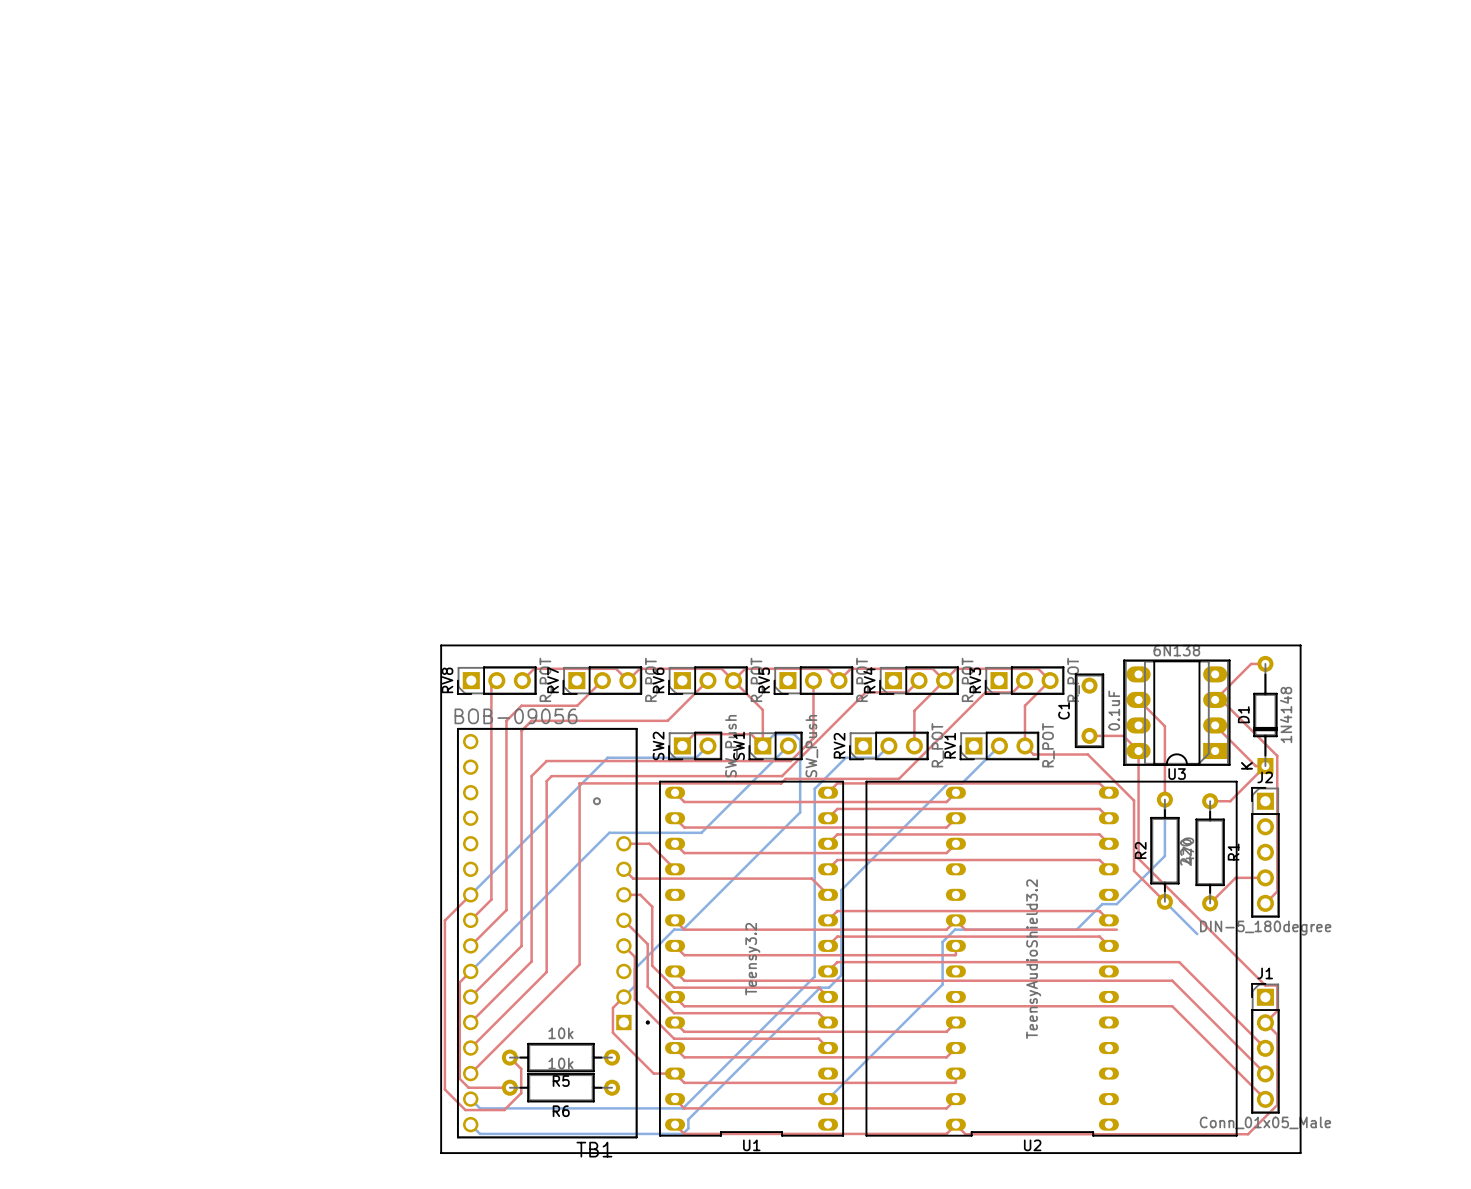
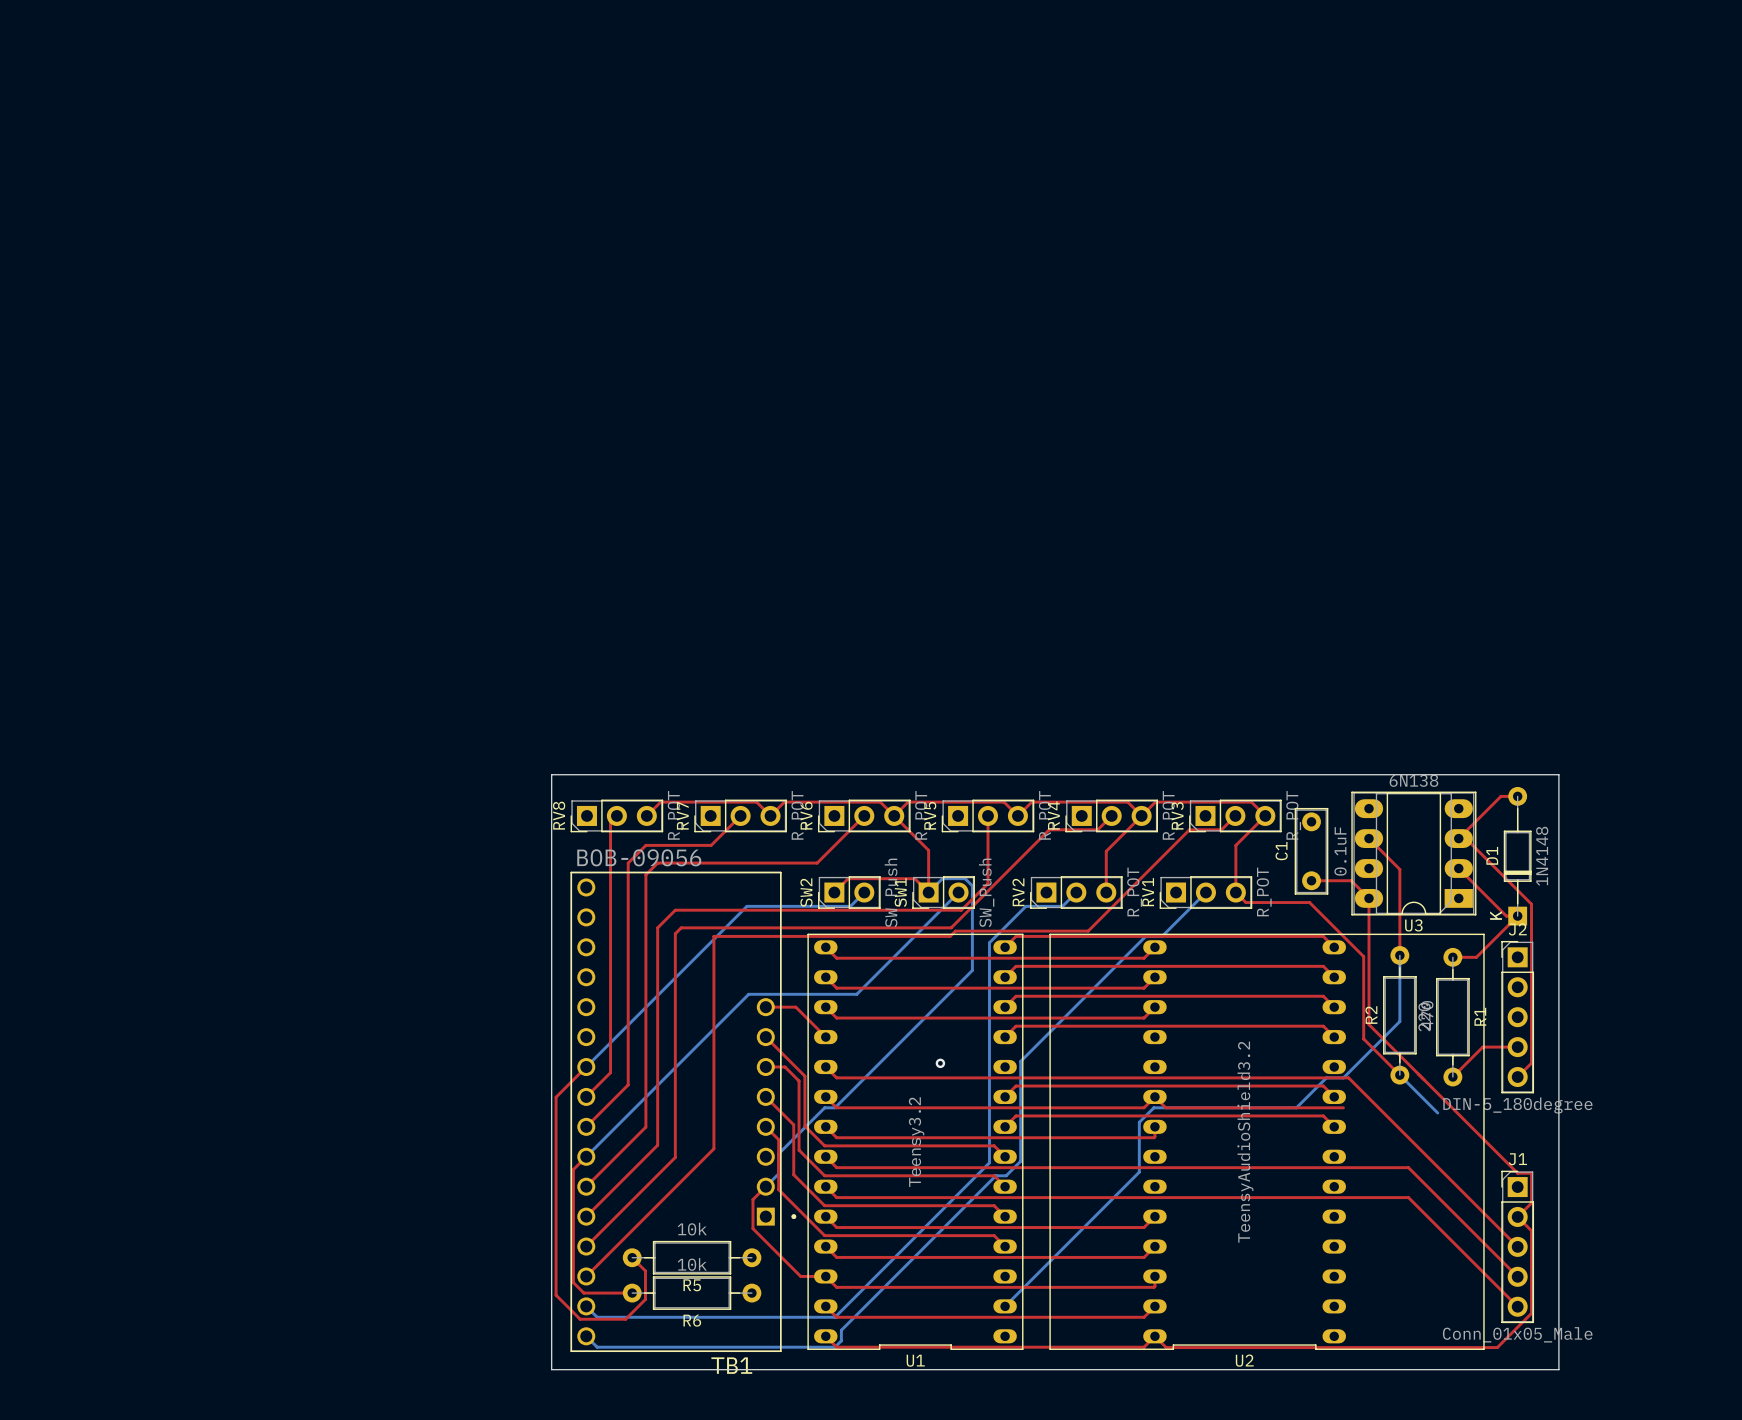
via: (596, 801) -> none
top track: (633, 878) (811, 878) (828, 894) -> (776, 1047) (804, 1076) (804, 1126) (824, 1145) (994, 1145) (1005, 1156)
via: none -> (940, 1063)
top track: (1179, 962) (837, 962) (828, 971) -> (1416, 1145) (1348, 1077) (836, 1077) (825, 1067)

